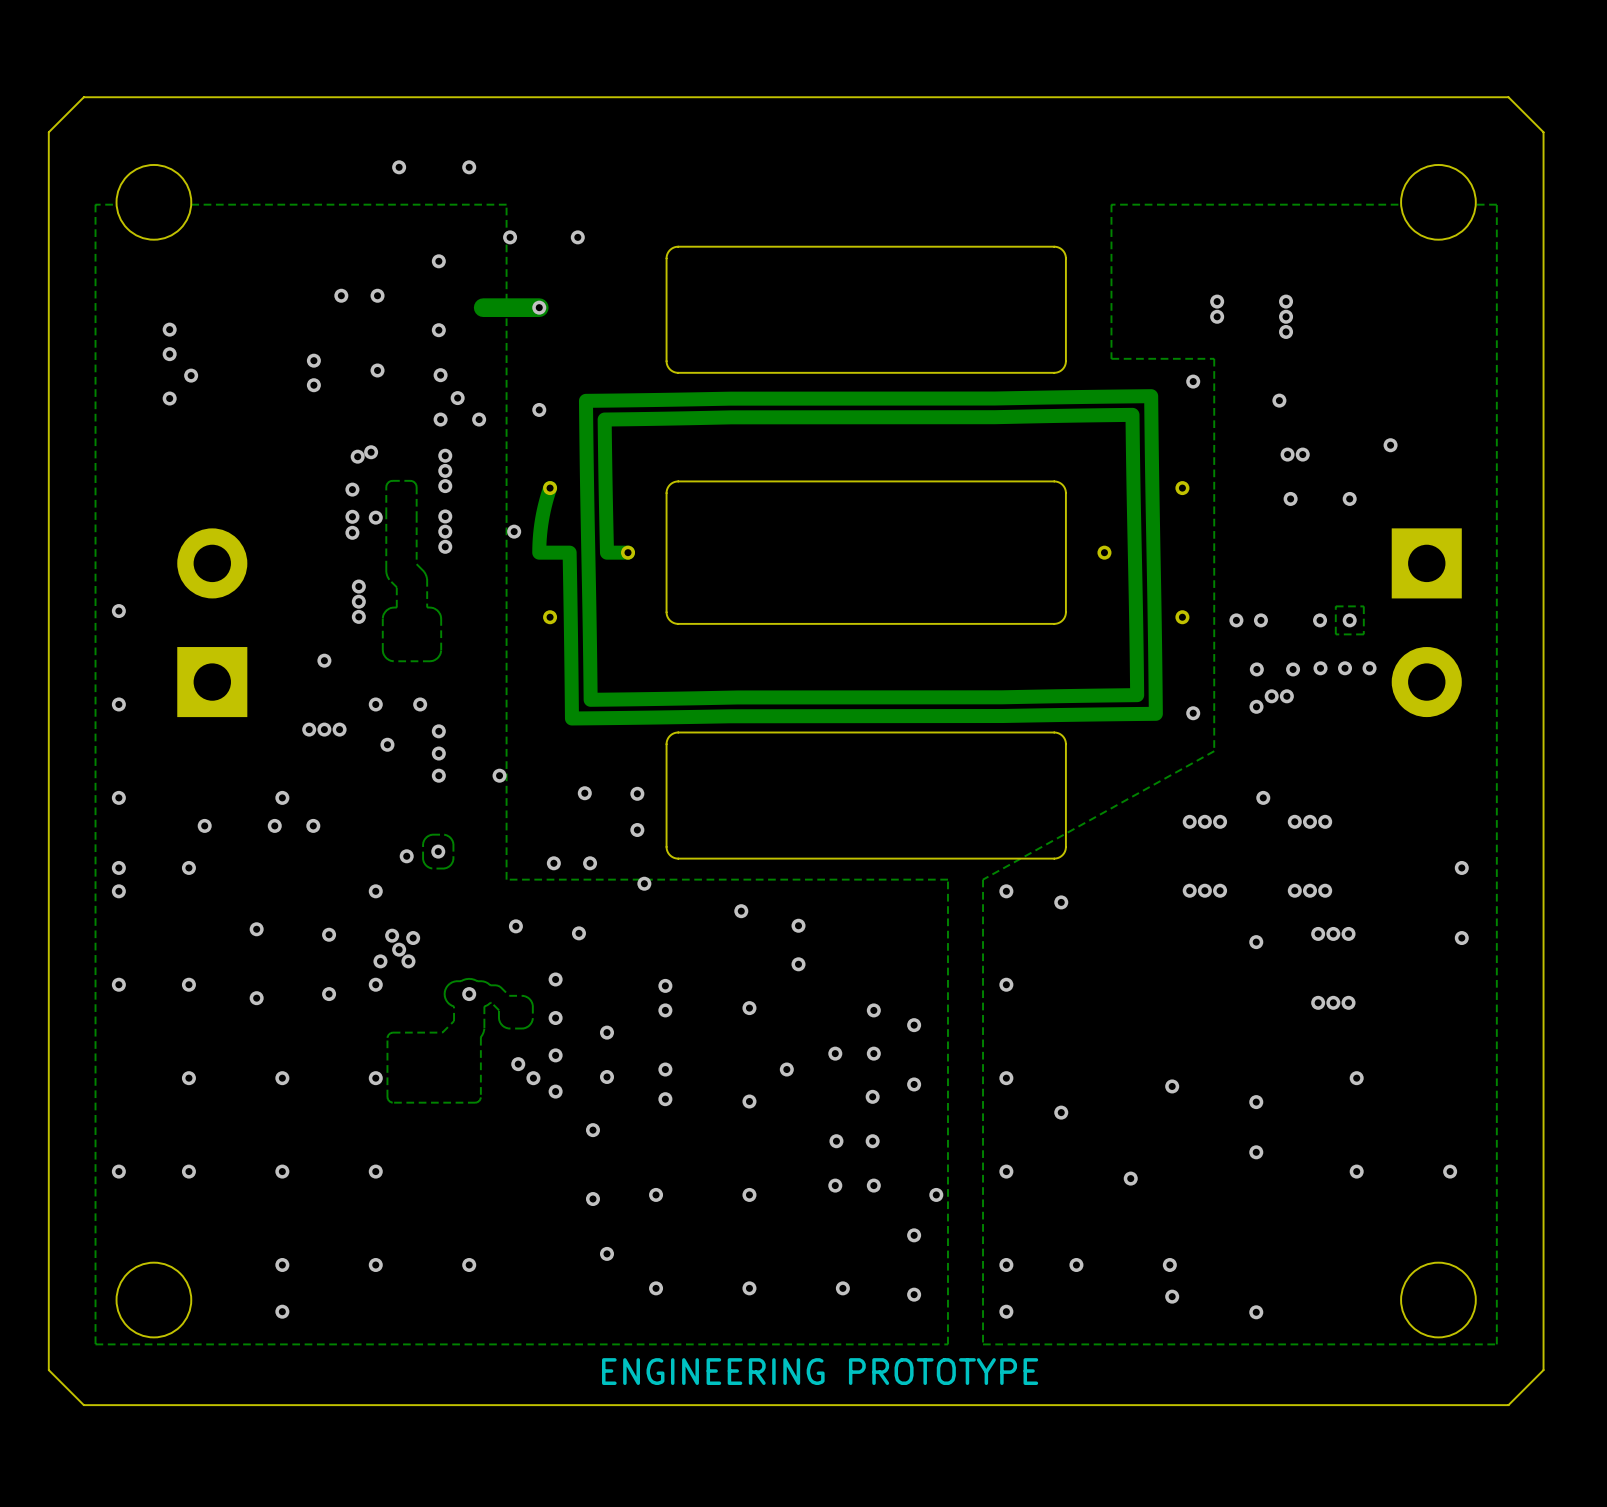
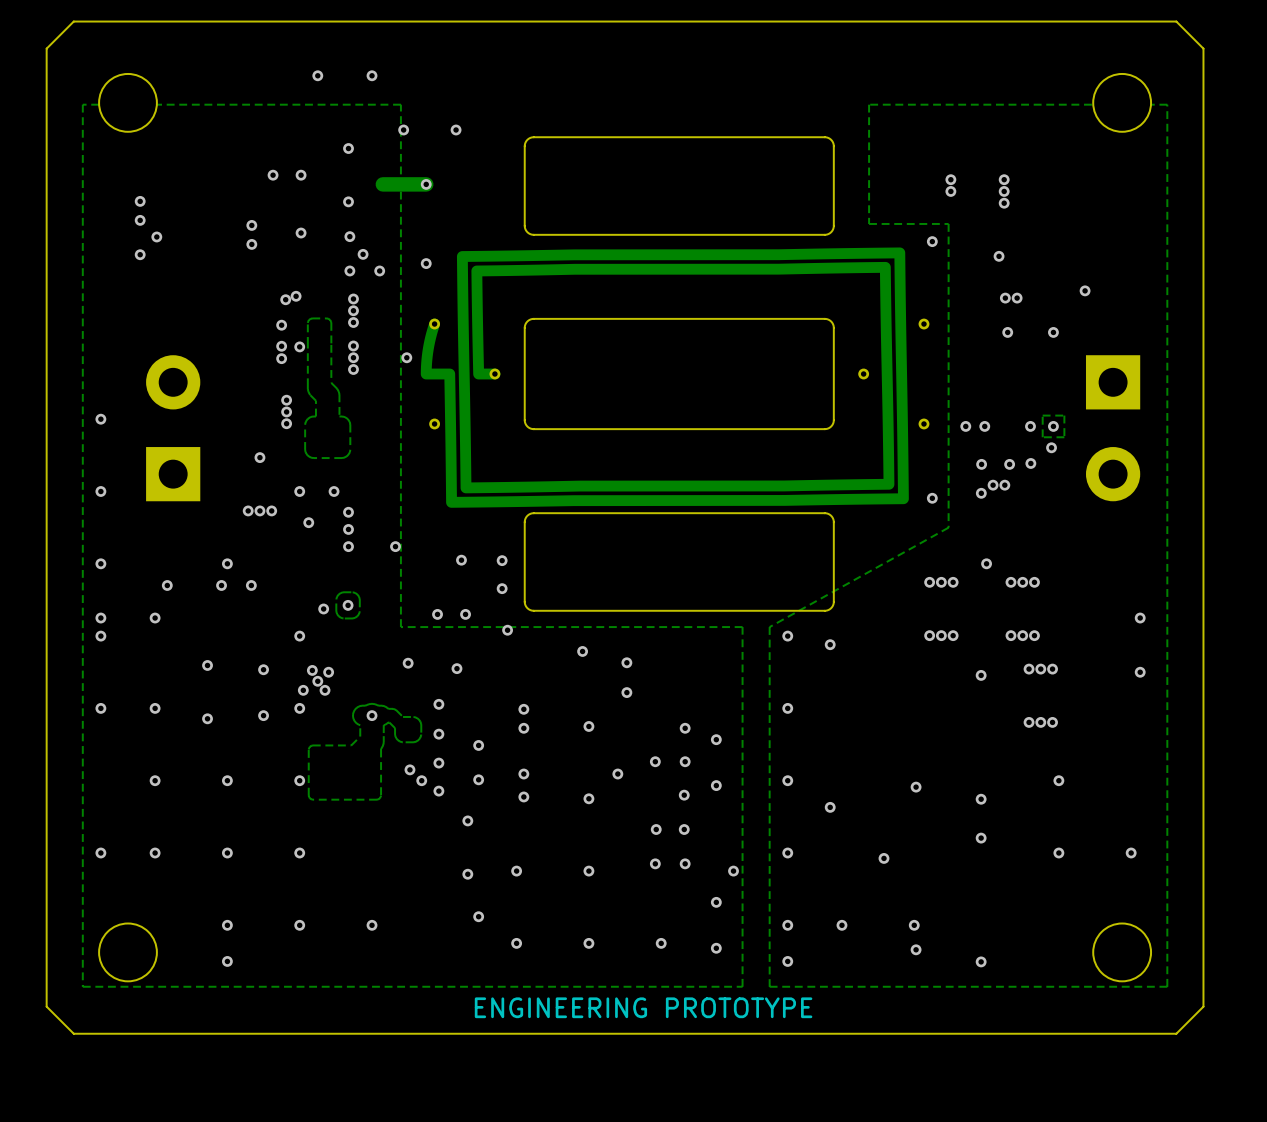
via: none -> (1051, 447)
via: (1345, 668) -> none
via: (1369, 668) -> none

